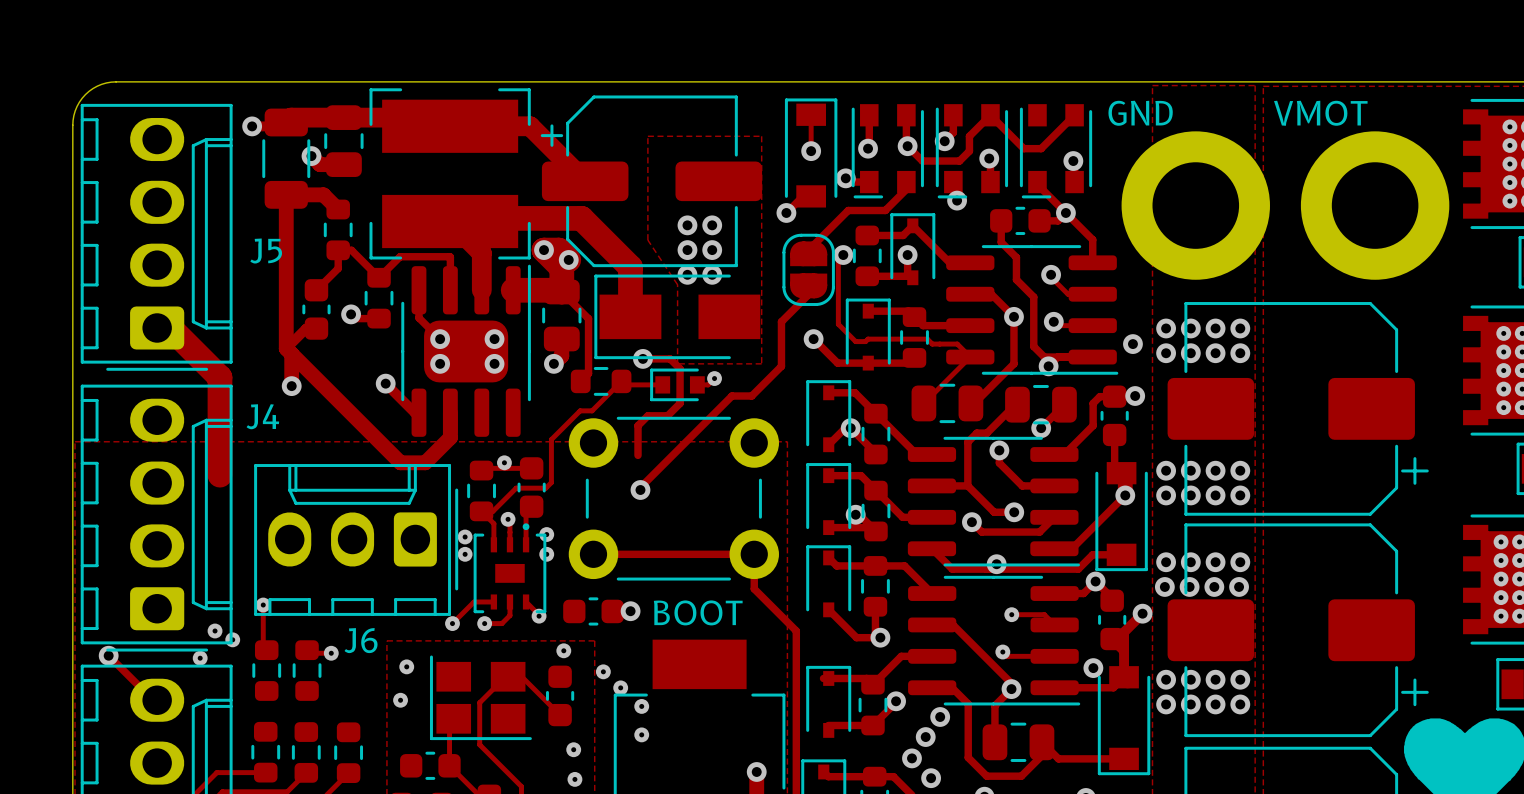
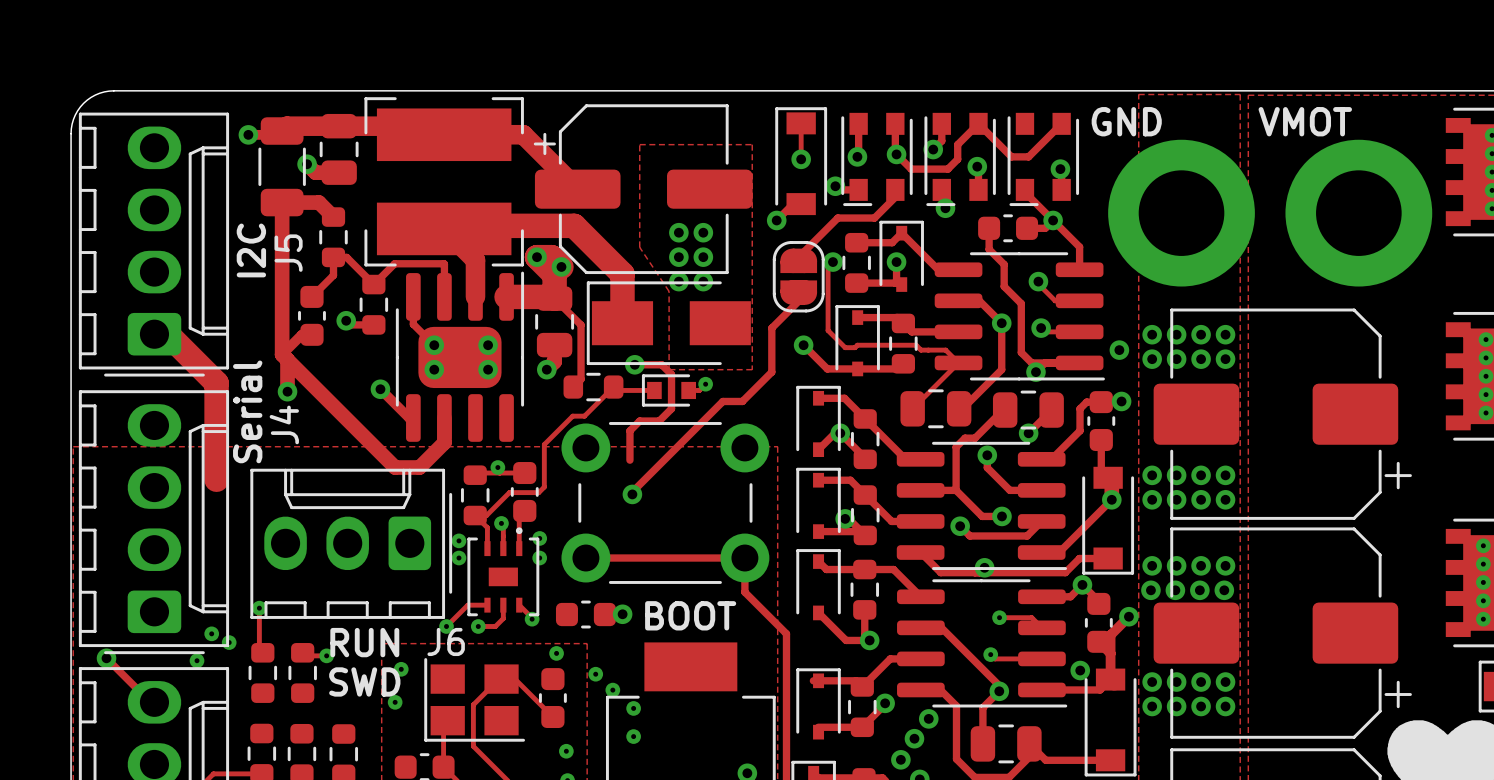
text: none -> I2C (251, 250)
J5 name rotation: 0° (266, 251) -> 90° counterclockwise (288, 253)
text: none -> Serial (247, 411)
J4 name rotation: 0° (262, 416) -> 90° counterclockwise (284, 424)
text: none -> RUN (364, 642)
J6 name position: J6 (361, 640) -> J6 (446, 641)
text: none -> SWD (364, 681)

